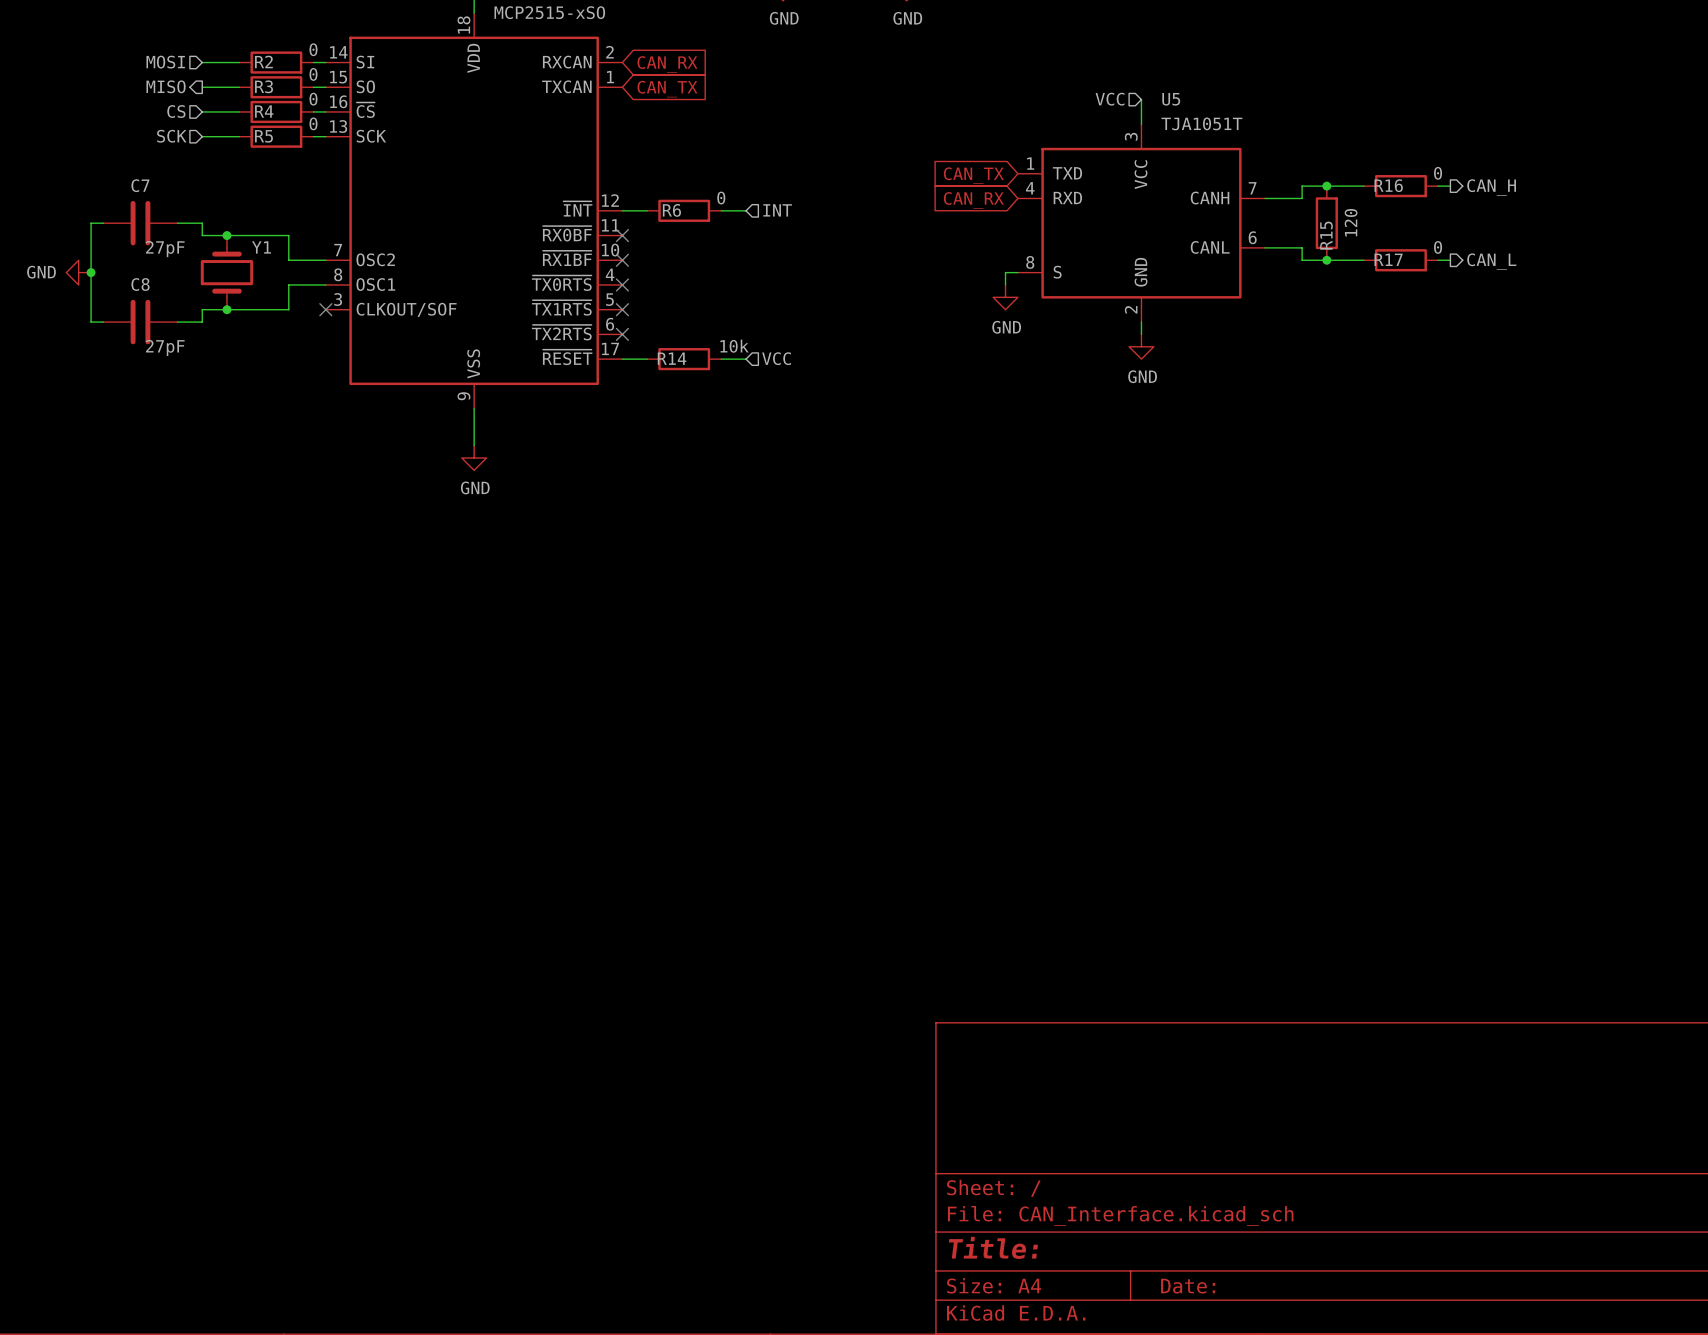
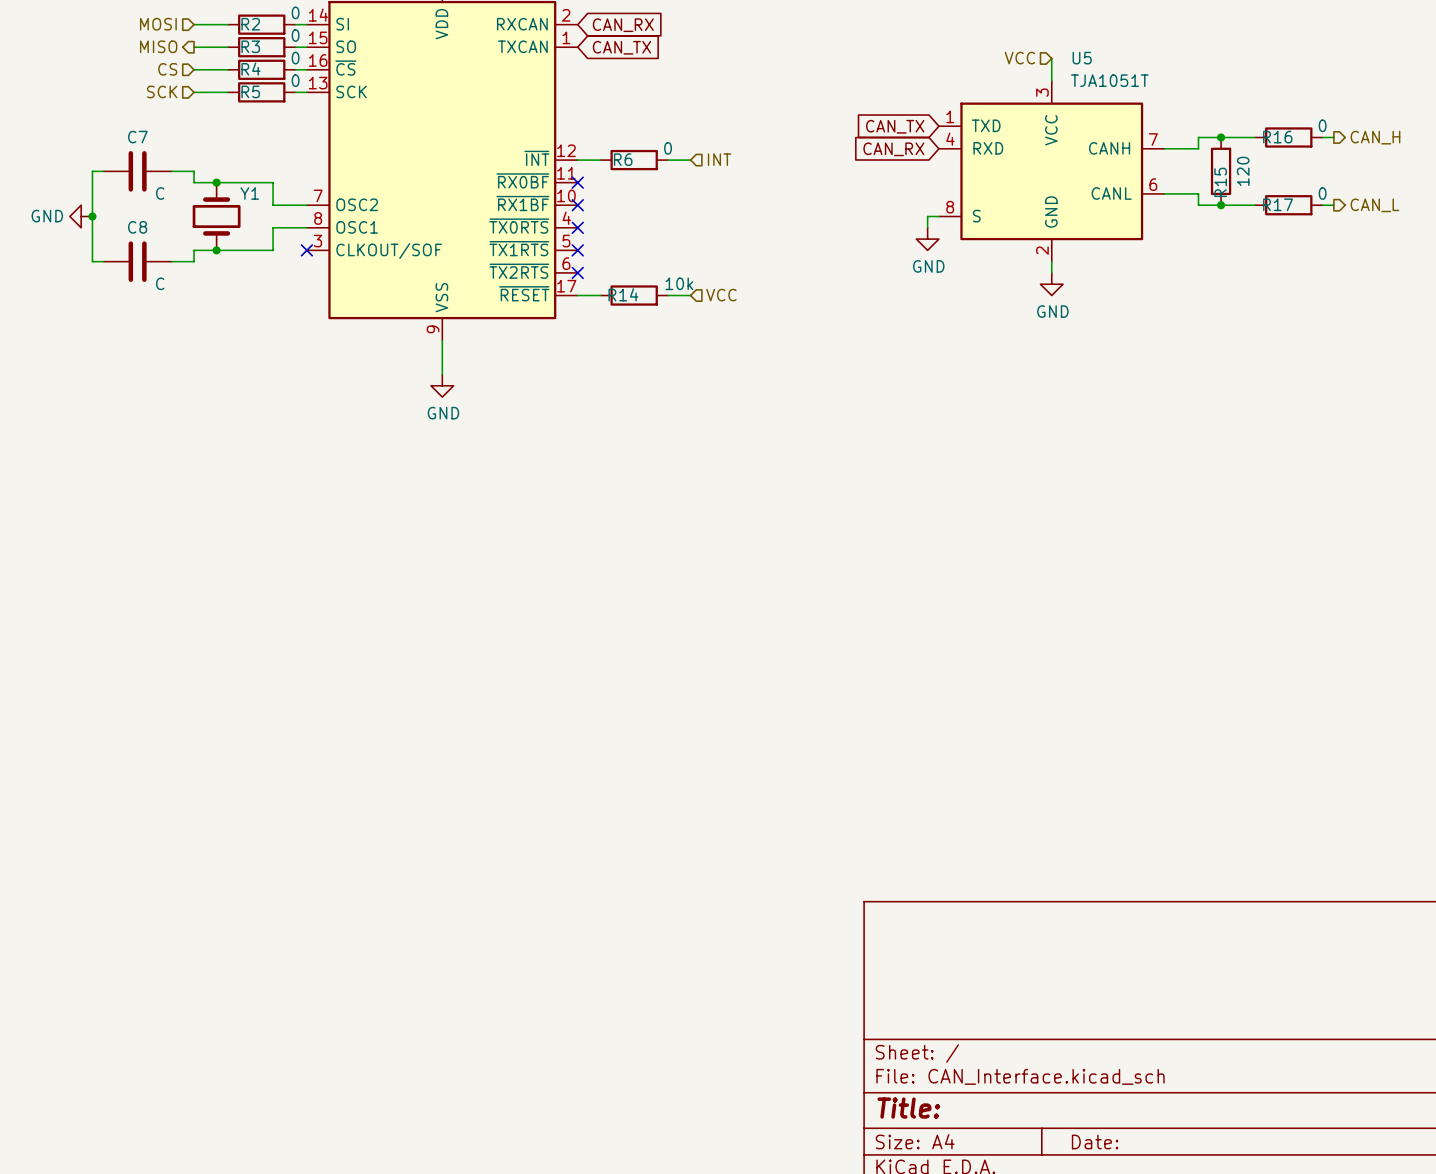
C7 value: 27pF (165, 249) -> C (160, 193)
C8 value: 27pF (165, 347) -> C (160, 283)

